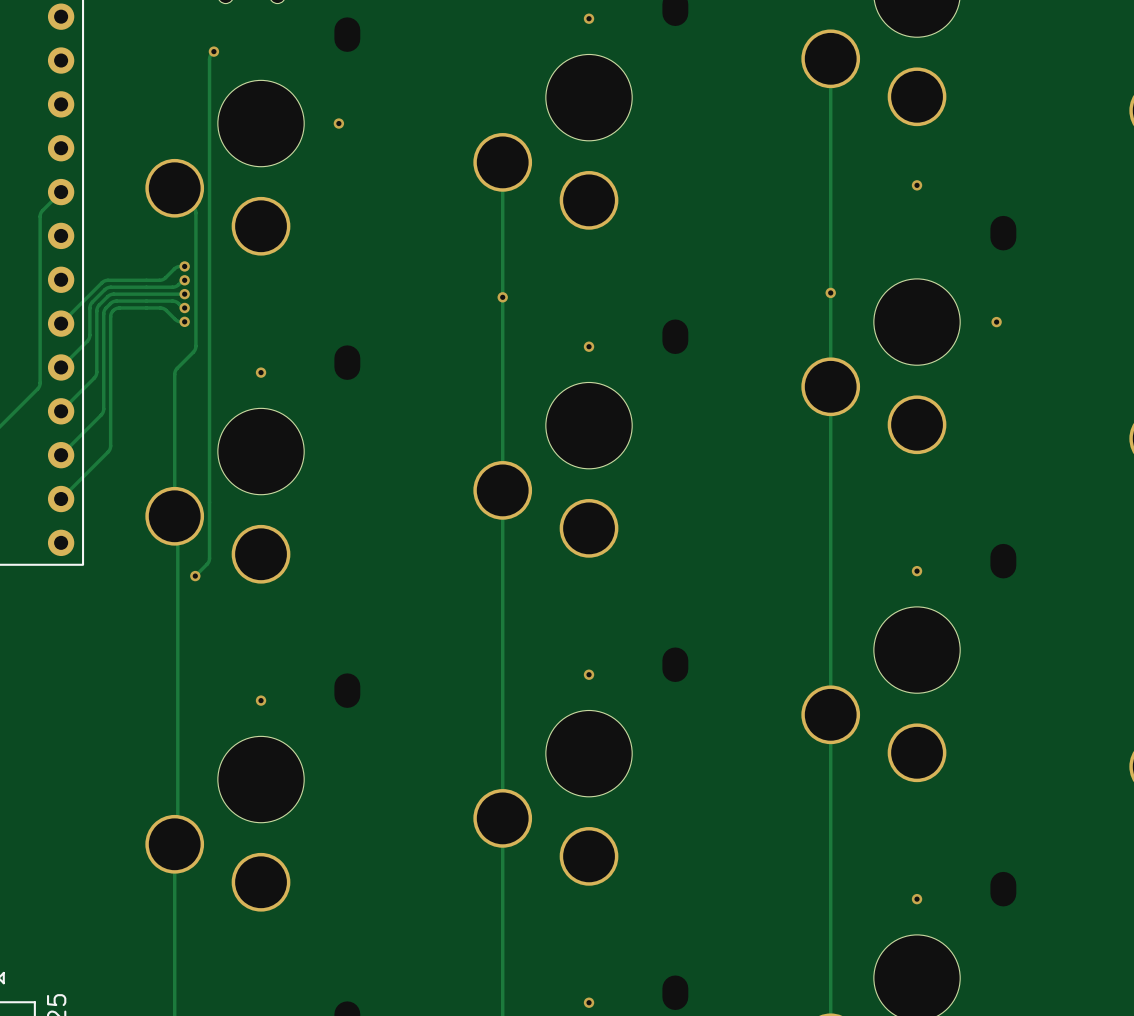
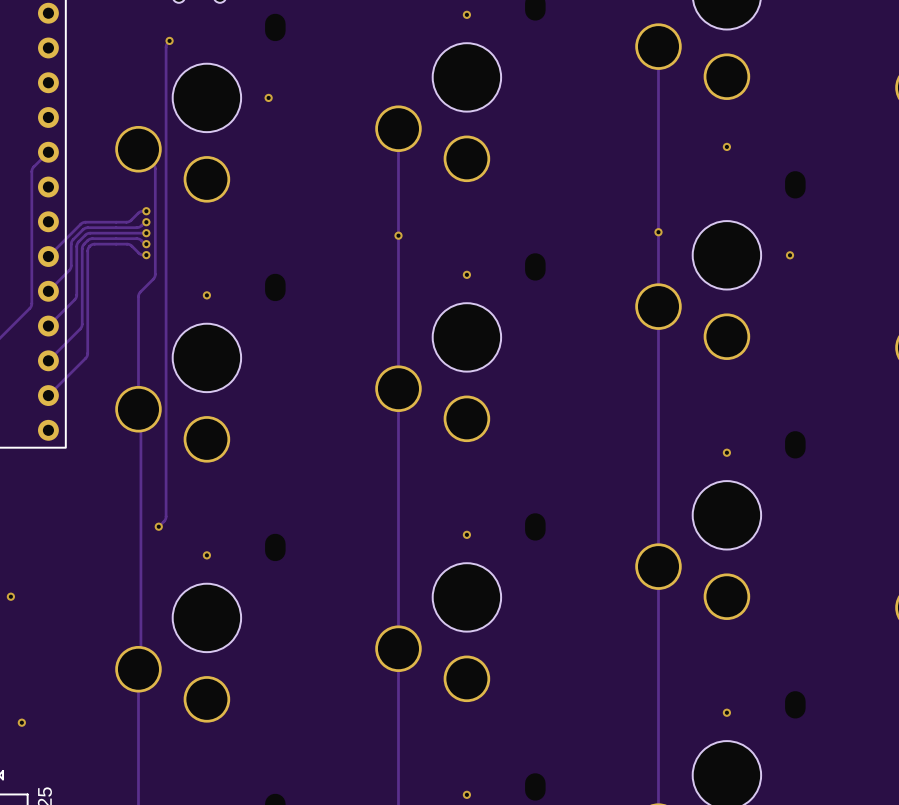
track: (209, 558) (207, 563) (195, 576) -> (166, 442) (166, 517) (158, 526)
via position: (195, 576) -> (158, 526)
via: none -> (10, 596)
via: none -> (21, 722)

